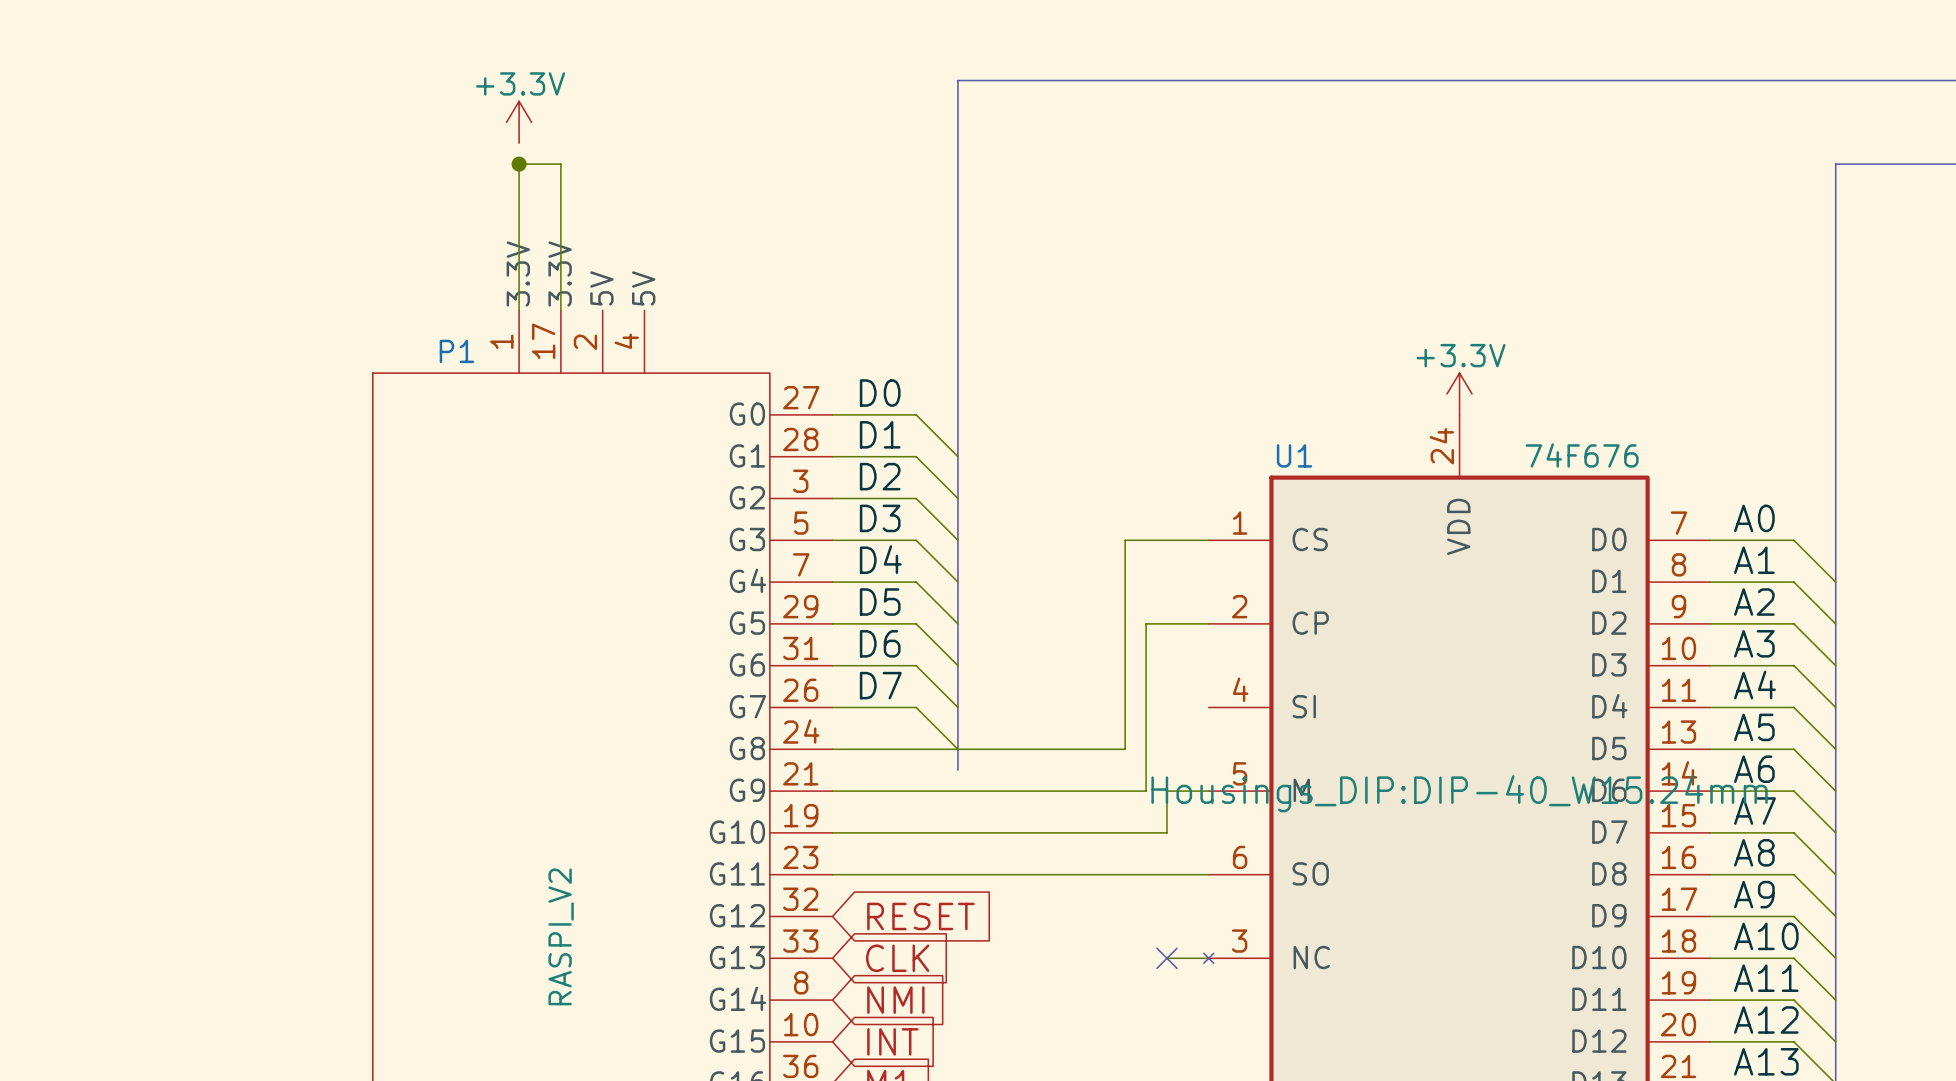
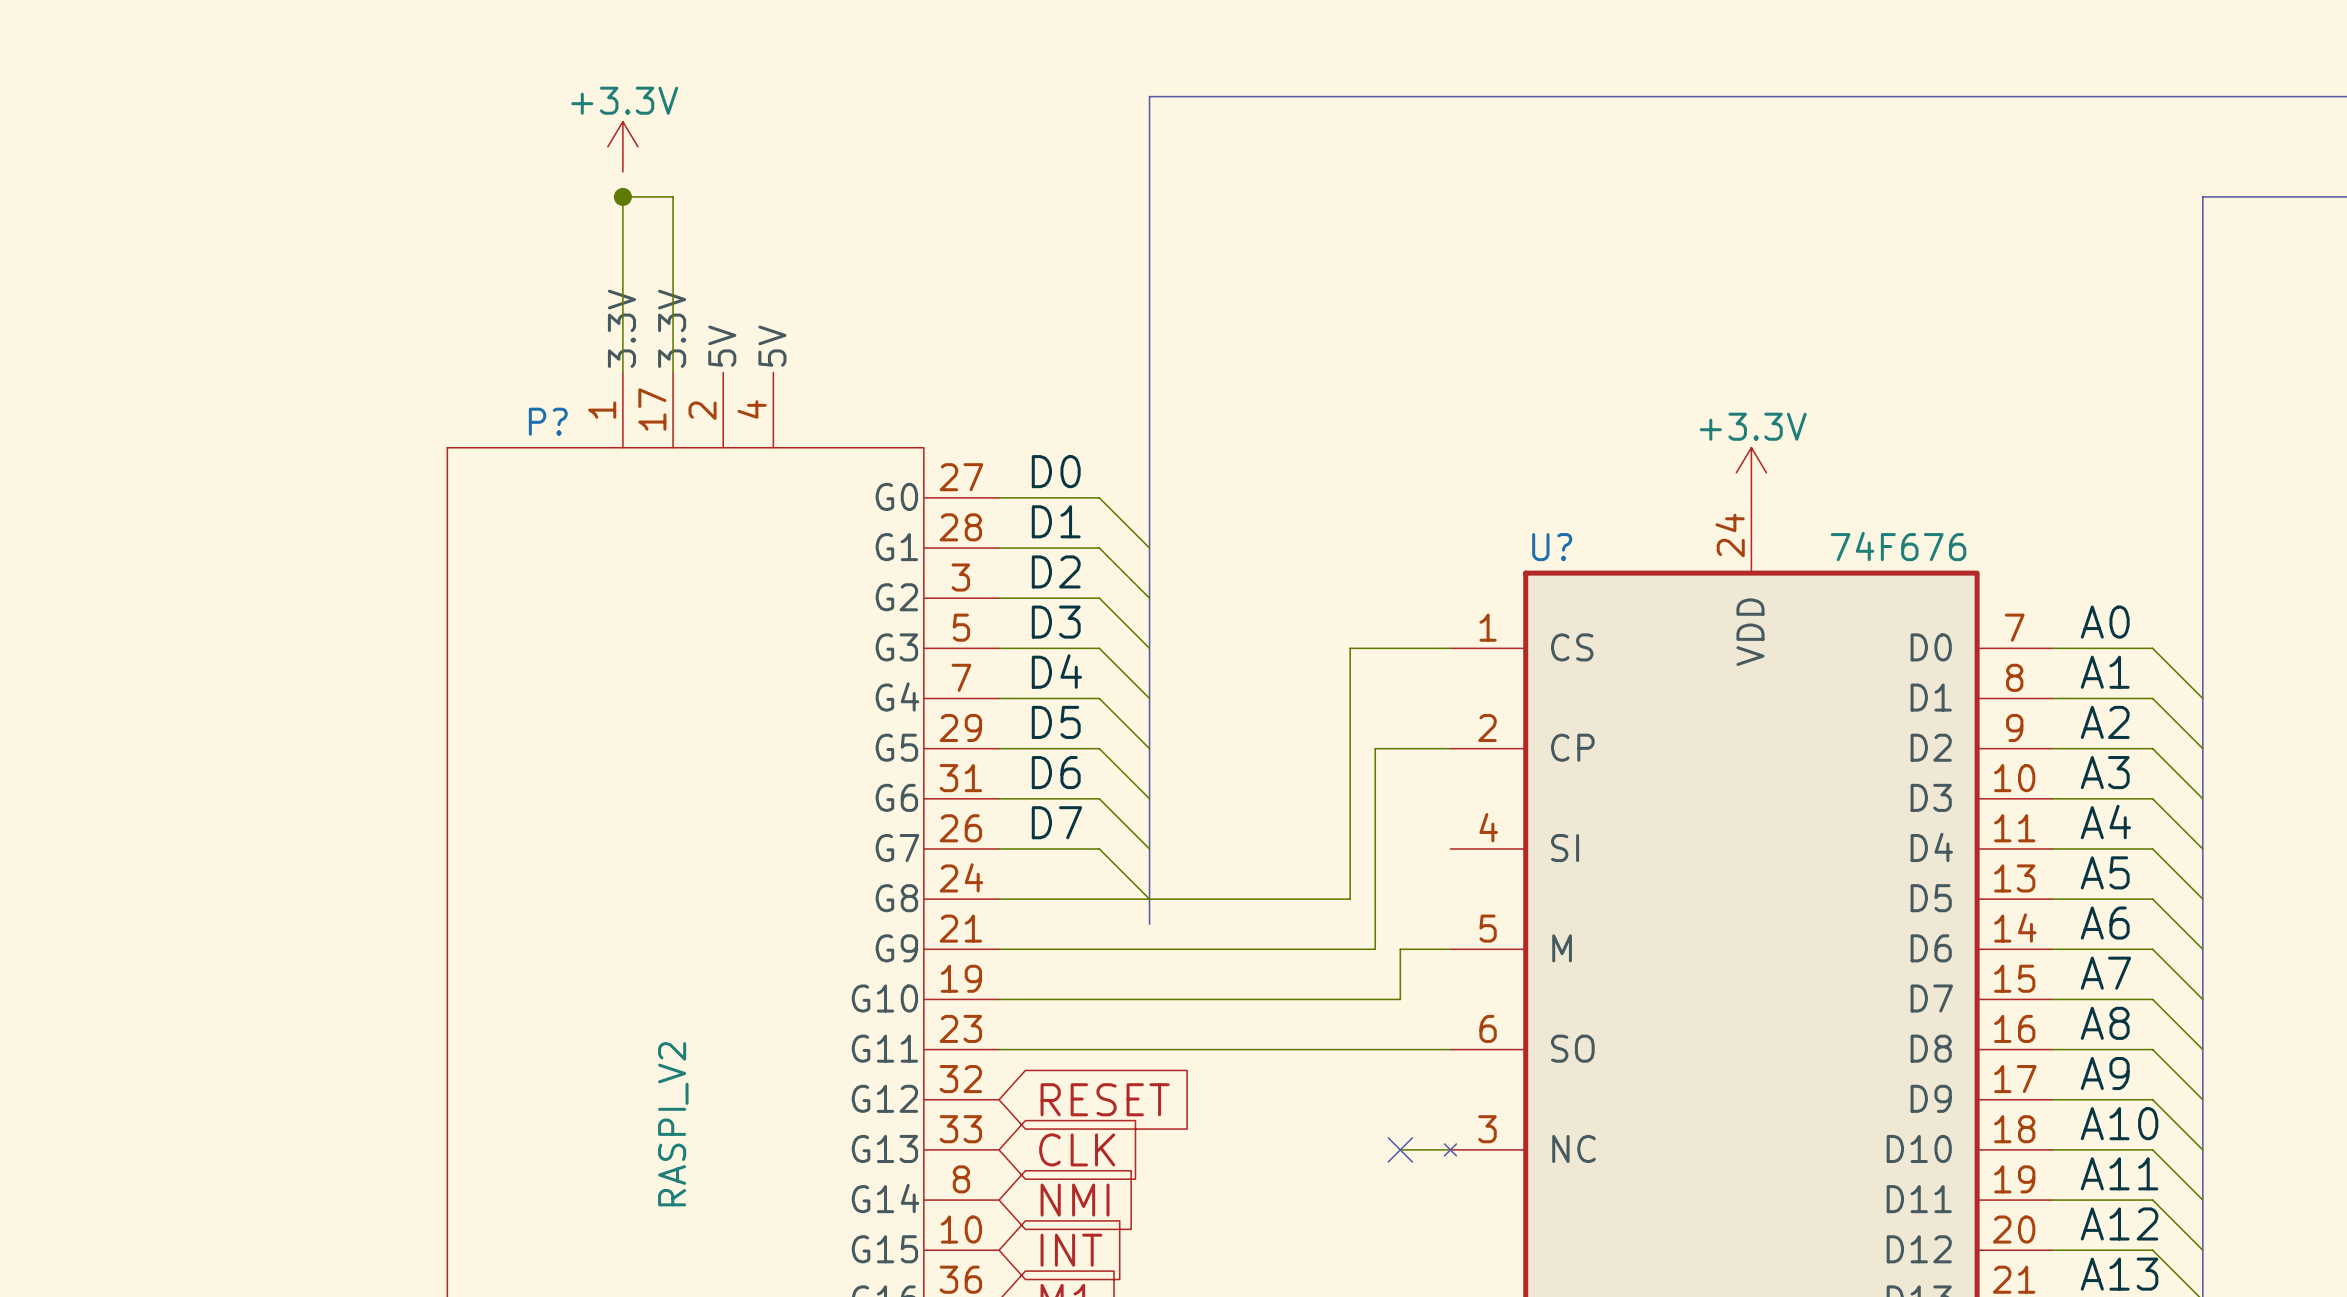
P1 name: P1 (456, 351) -> P? (548, 421)
U1 name: U1 (1294, 455) -> U? (1552, 547)
U1 text: Housings_DIP:DIP-40_W15.24mm (1459, 793) -> none

